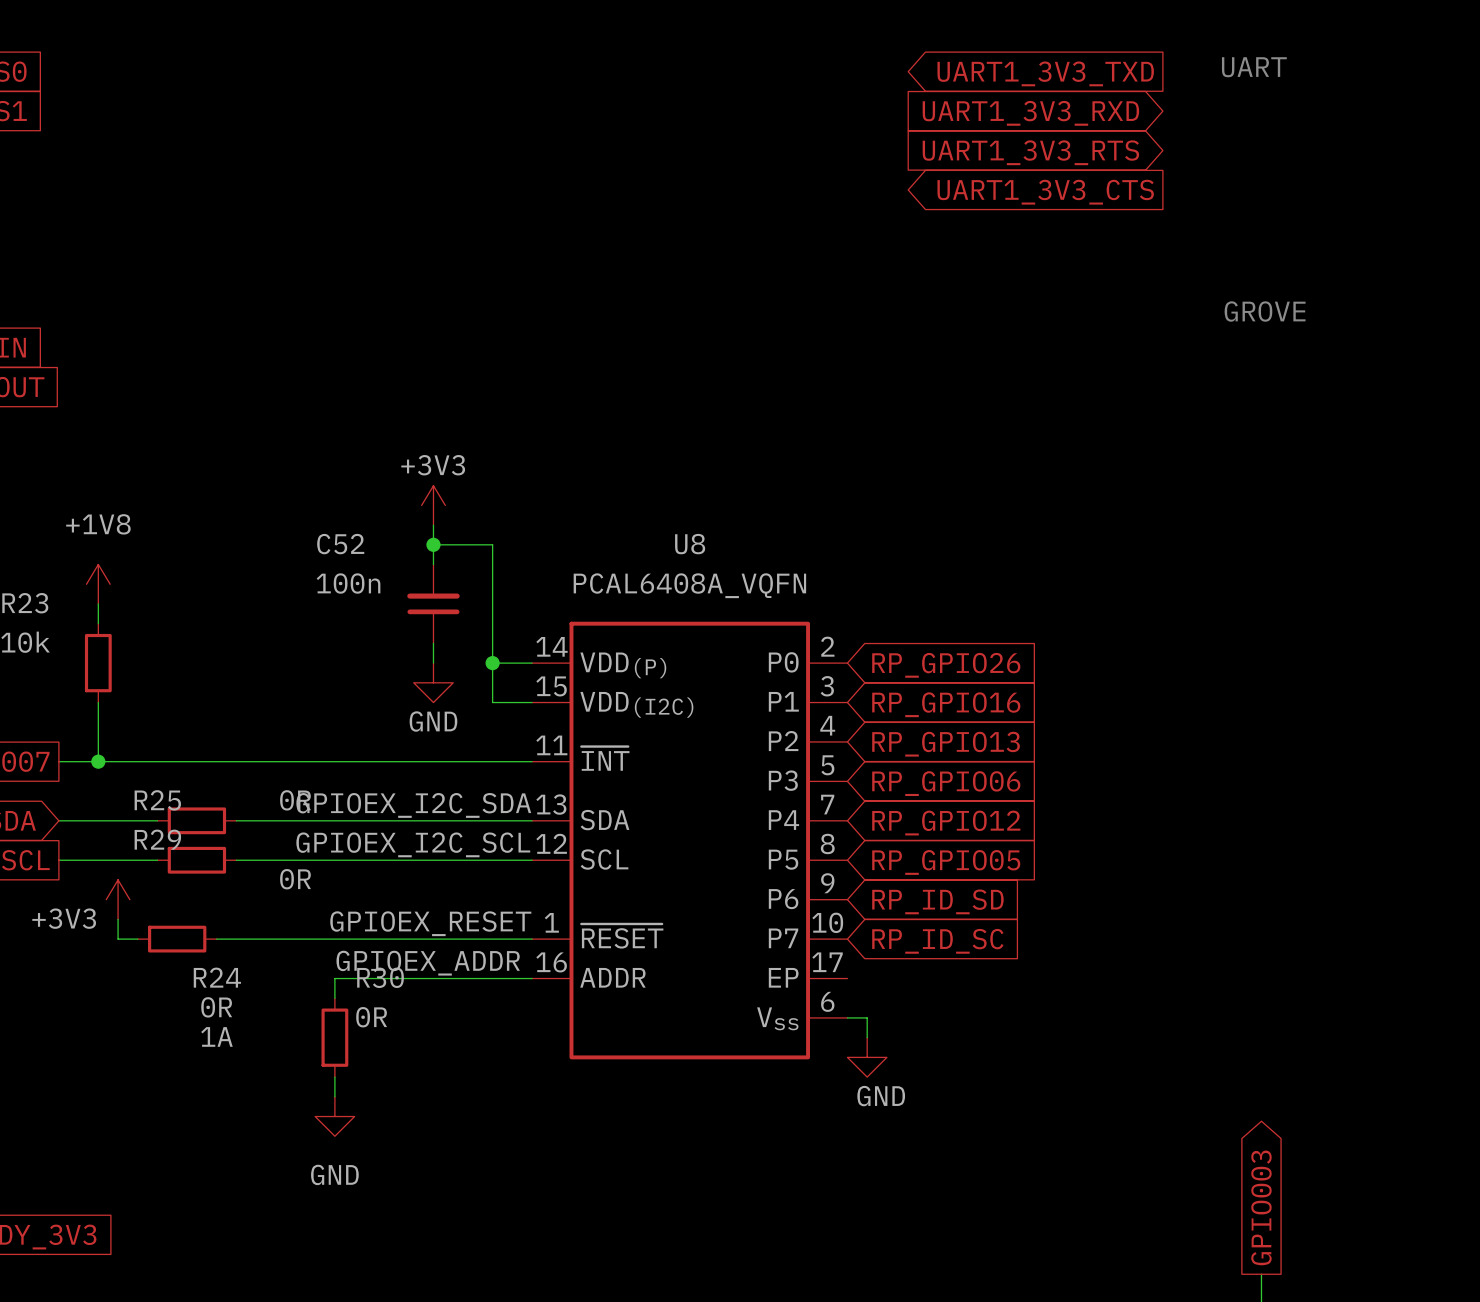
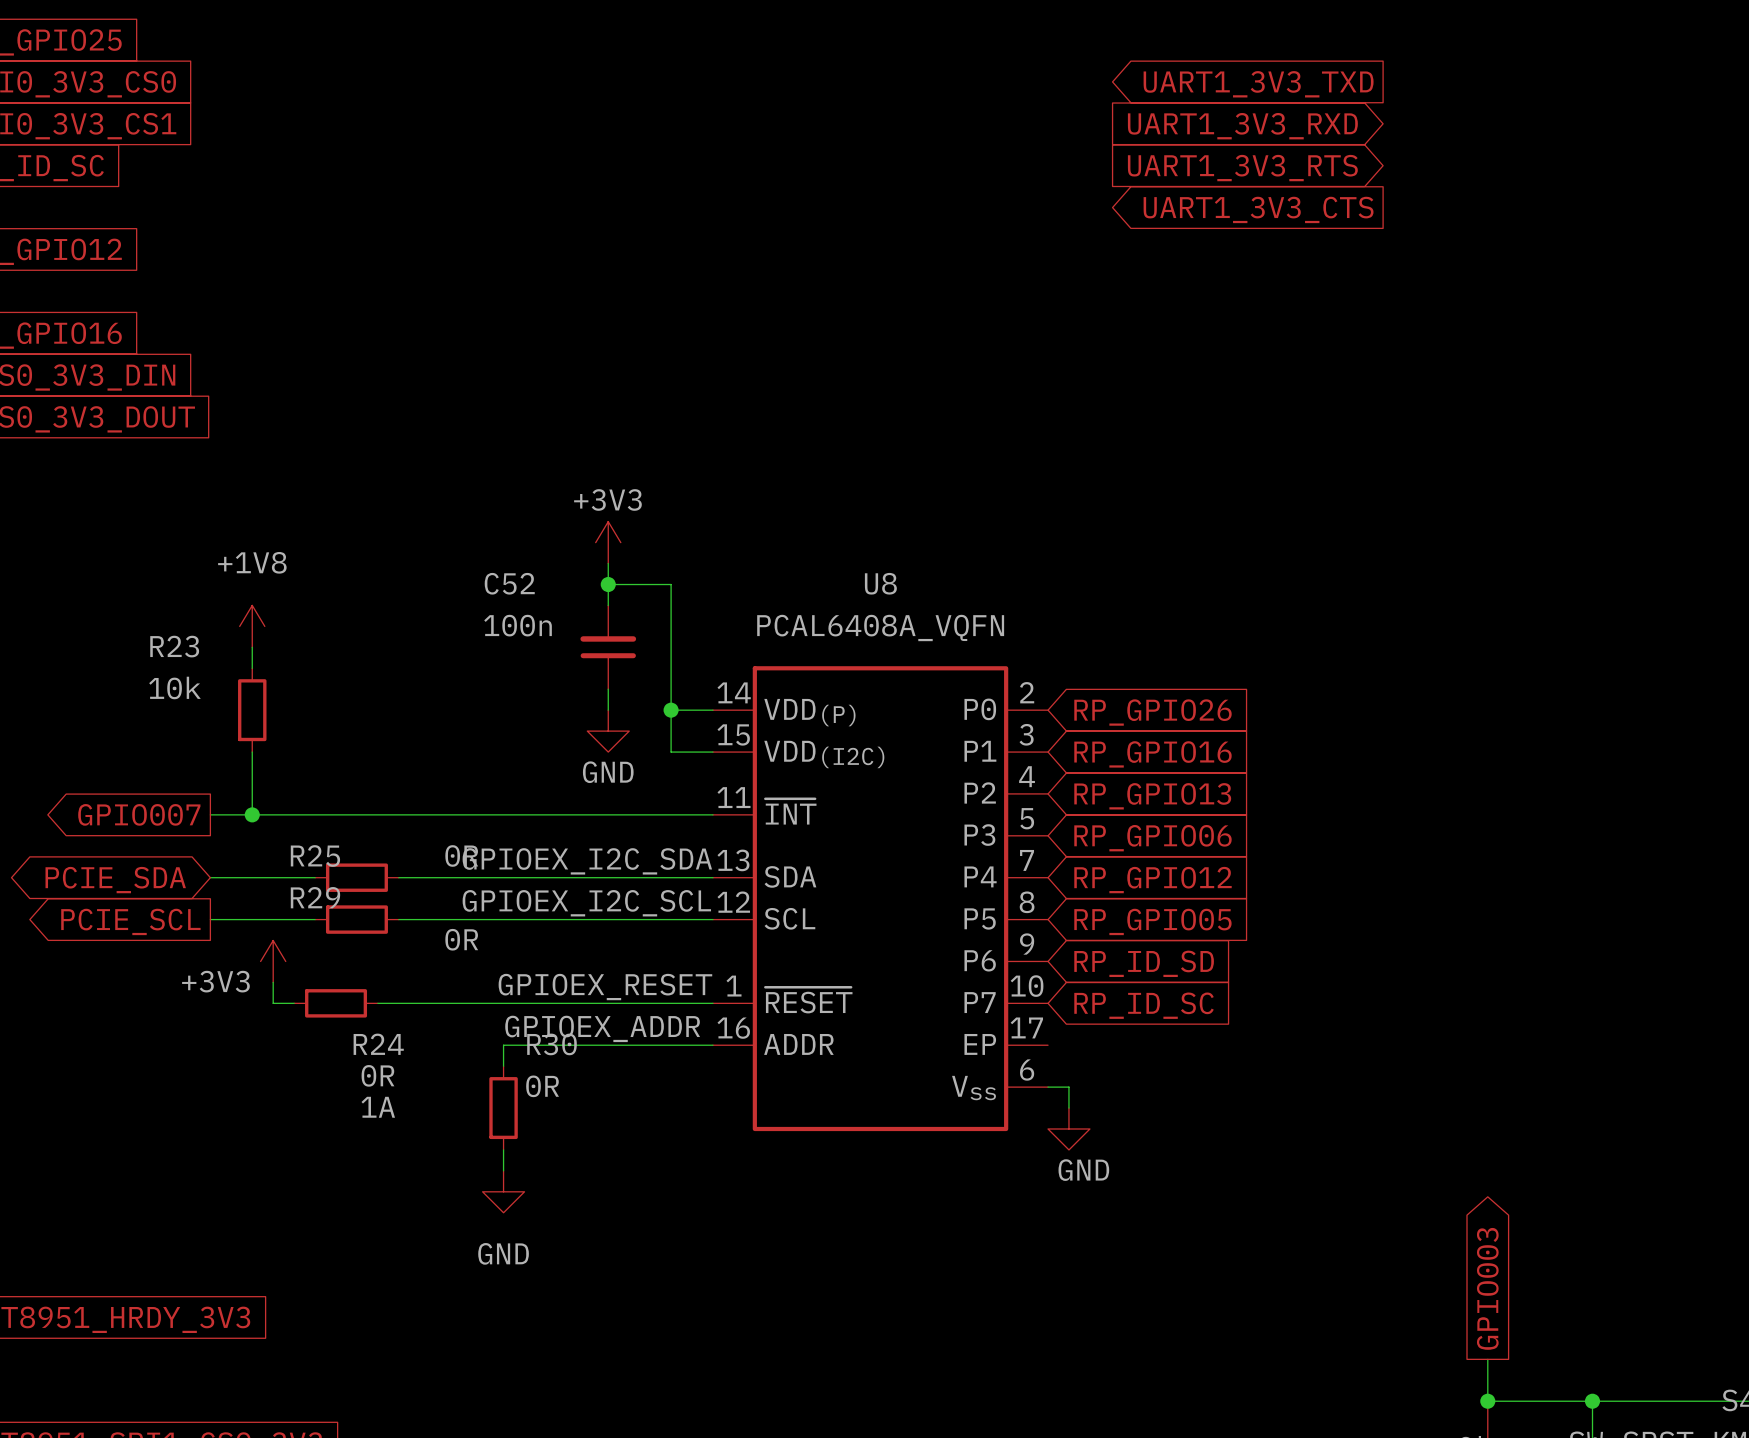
text: UART (1254, 67) -> none
text: GROVE (1265, 311) -> none

